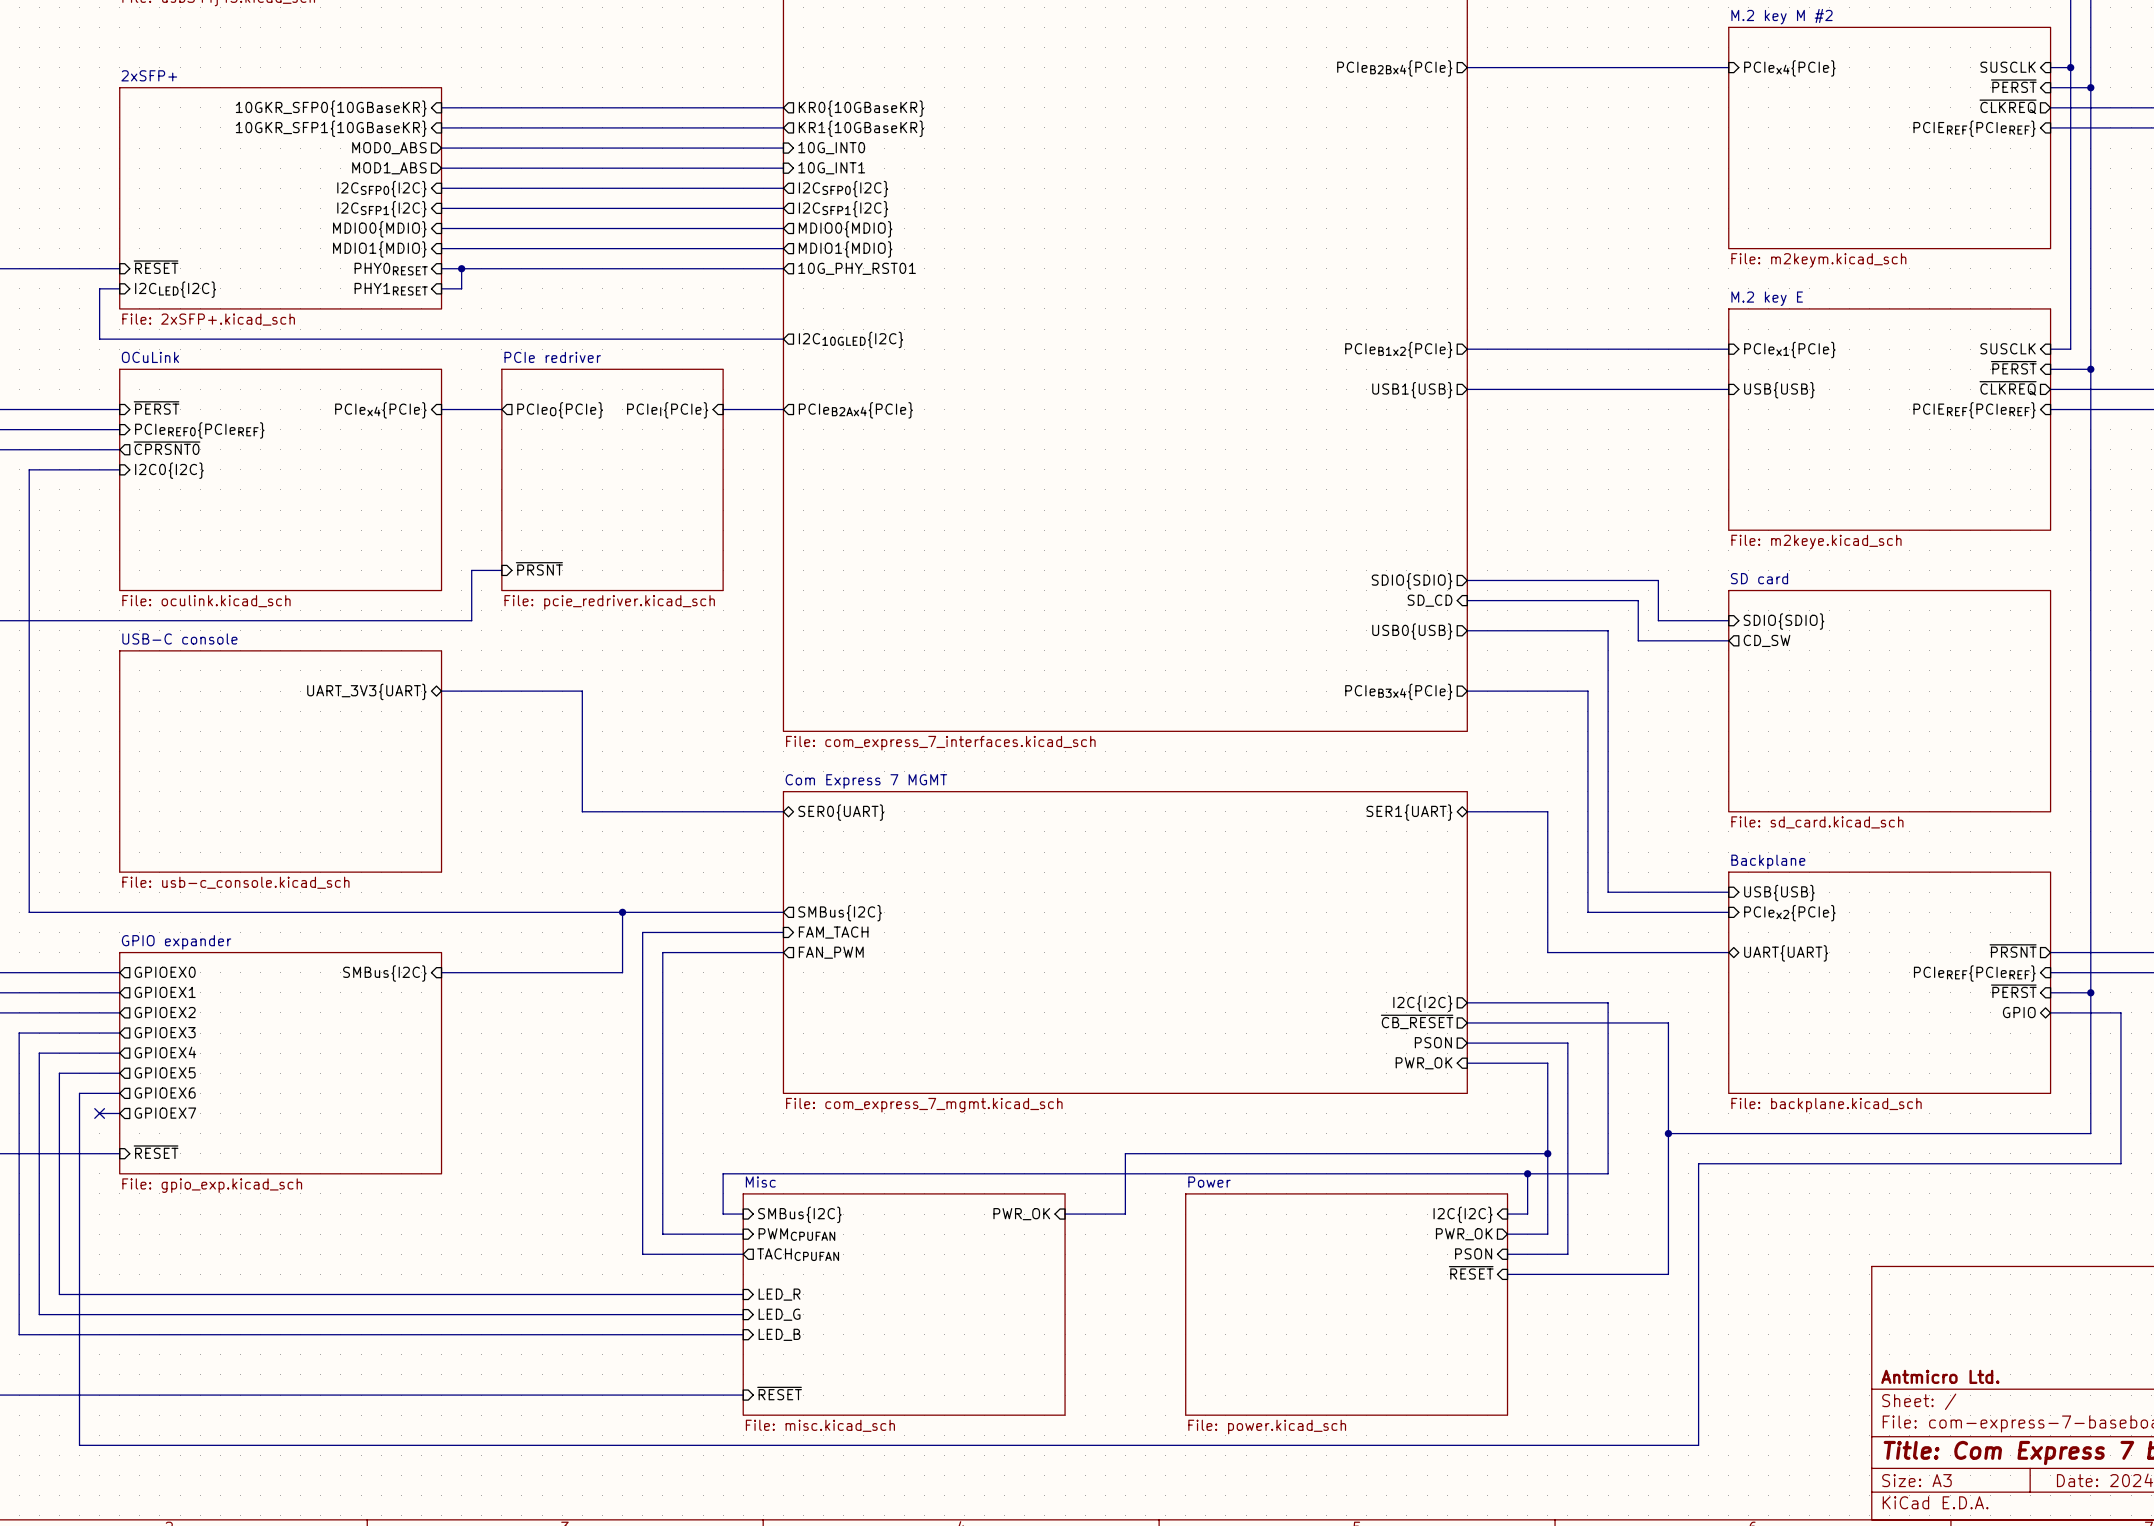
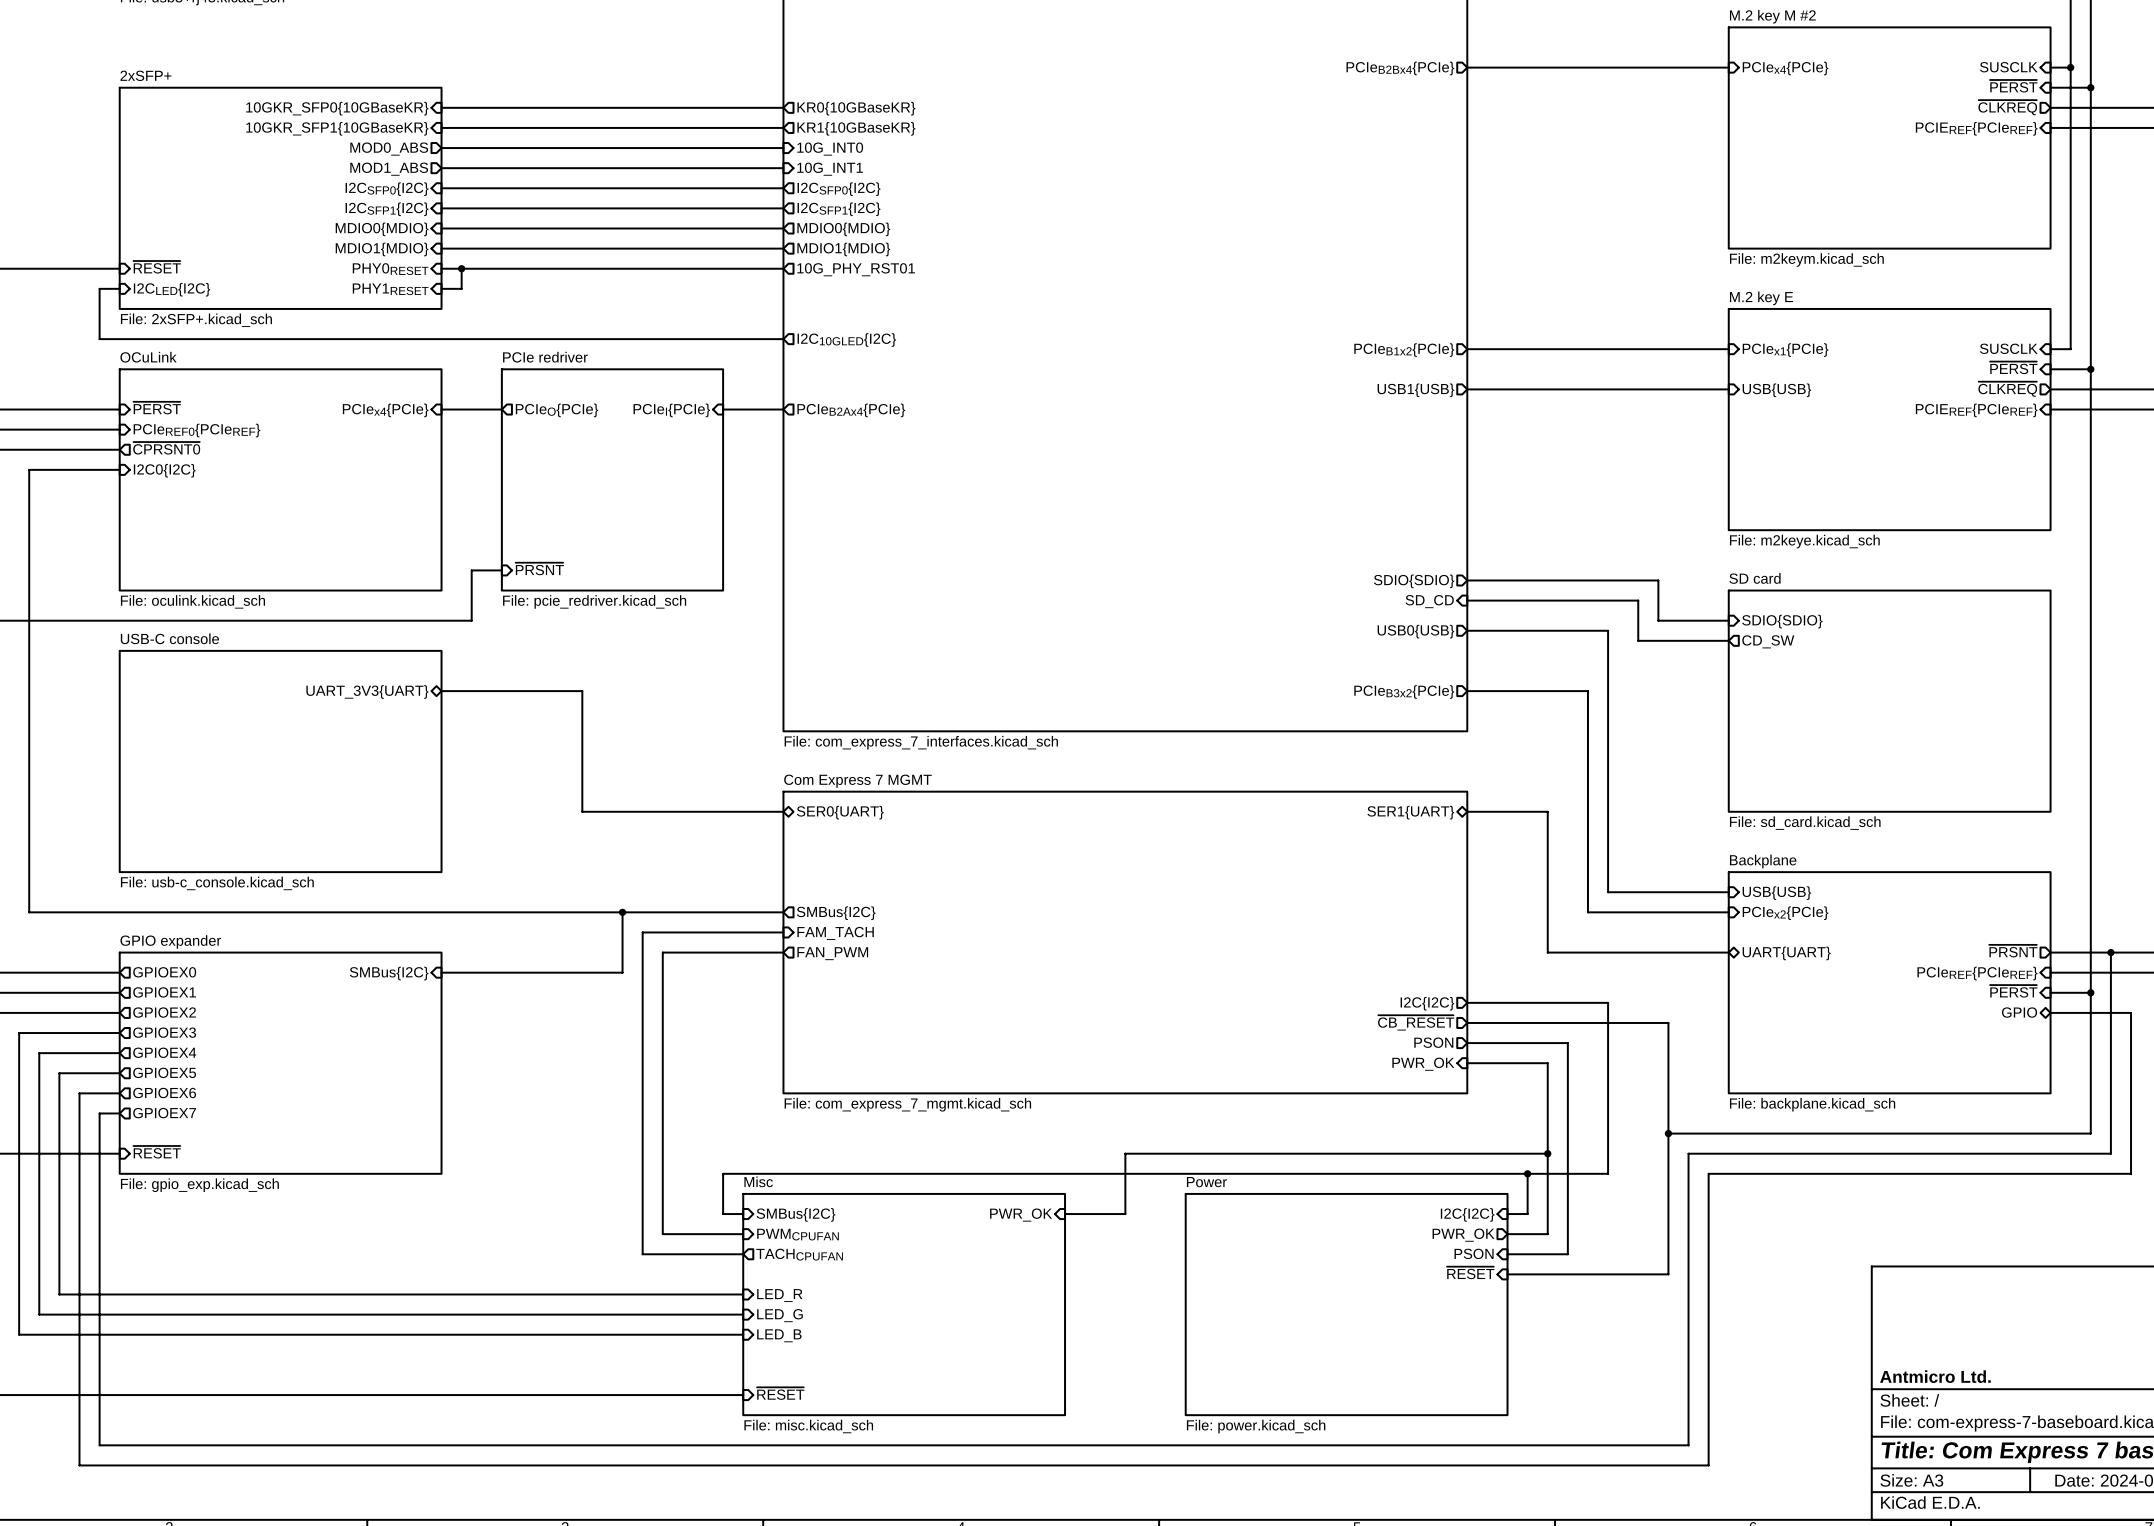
sheet pin: PCIeB3x4{PCIe} (1398, 691) -> PCIeB3x2{PCIe} (1404, 691)
junction: none -> (2110, 952)
wire: (2120, 1012) (2120, 1163) (1698, 1163) (1698, 1445) (1688, 1445) -> (2110, 952) (2110, 1153) (1688, 1153) (1688, 1445)
wire: none -> (2120, 1012) (2131, 1012) (2131, 1173) (1708, 1173) (1708, 1465) (79, 1465) (79, 1445)
no-connect mark: (99, 1113) -> none
wire: (79, 1445) (99, 1445) -> (99, 1113) (99, 1445)

